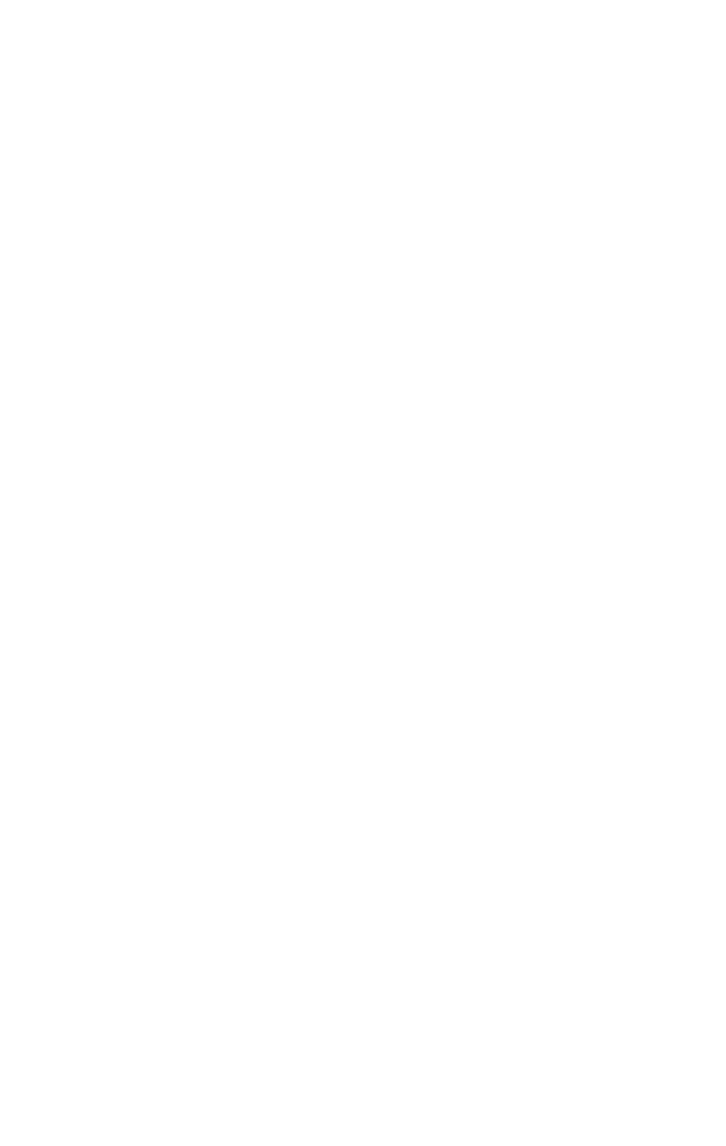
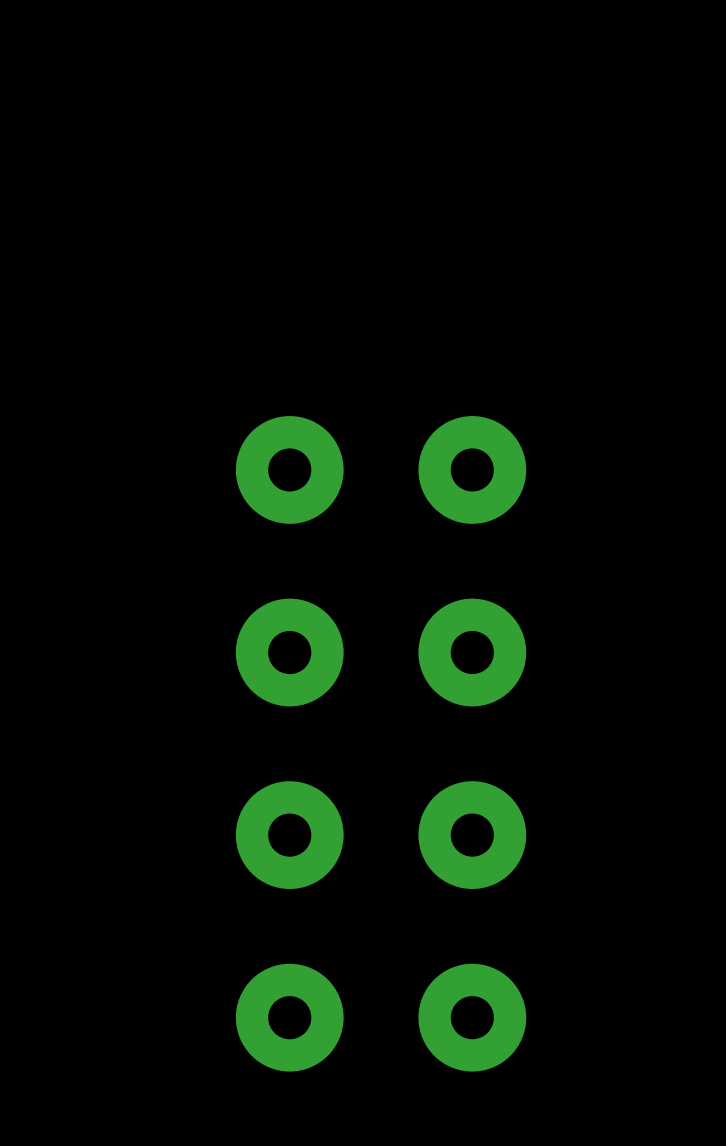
part: none -> (381, 743)

